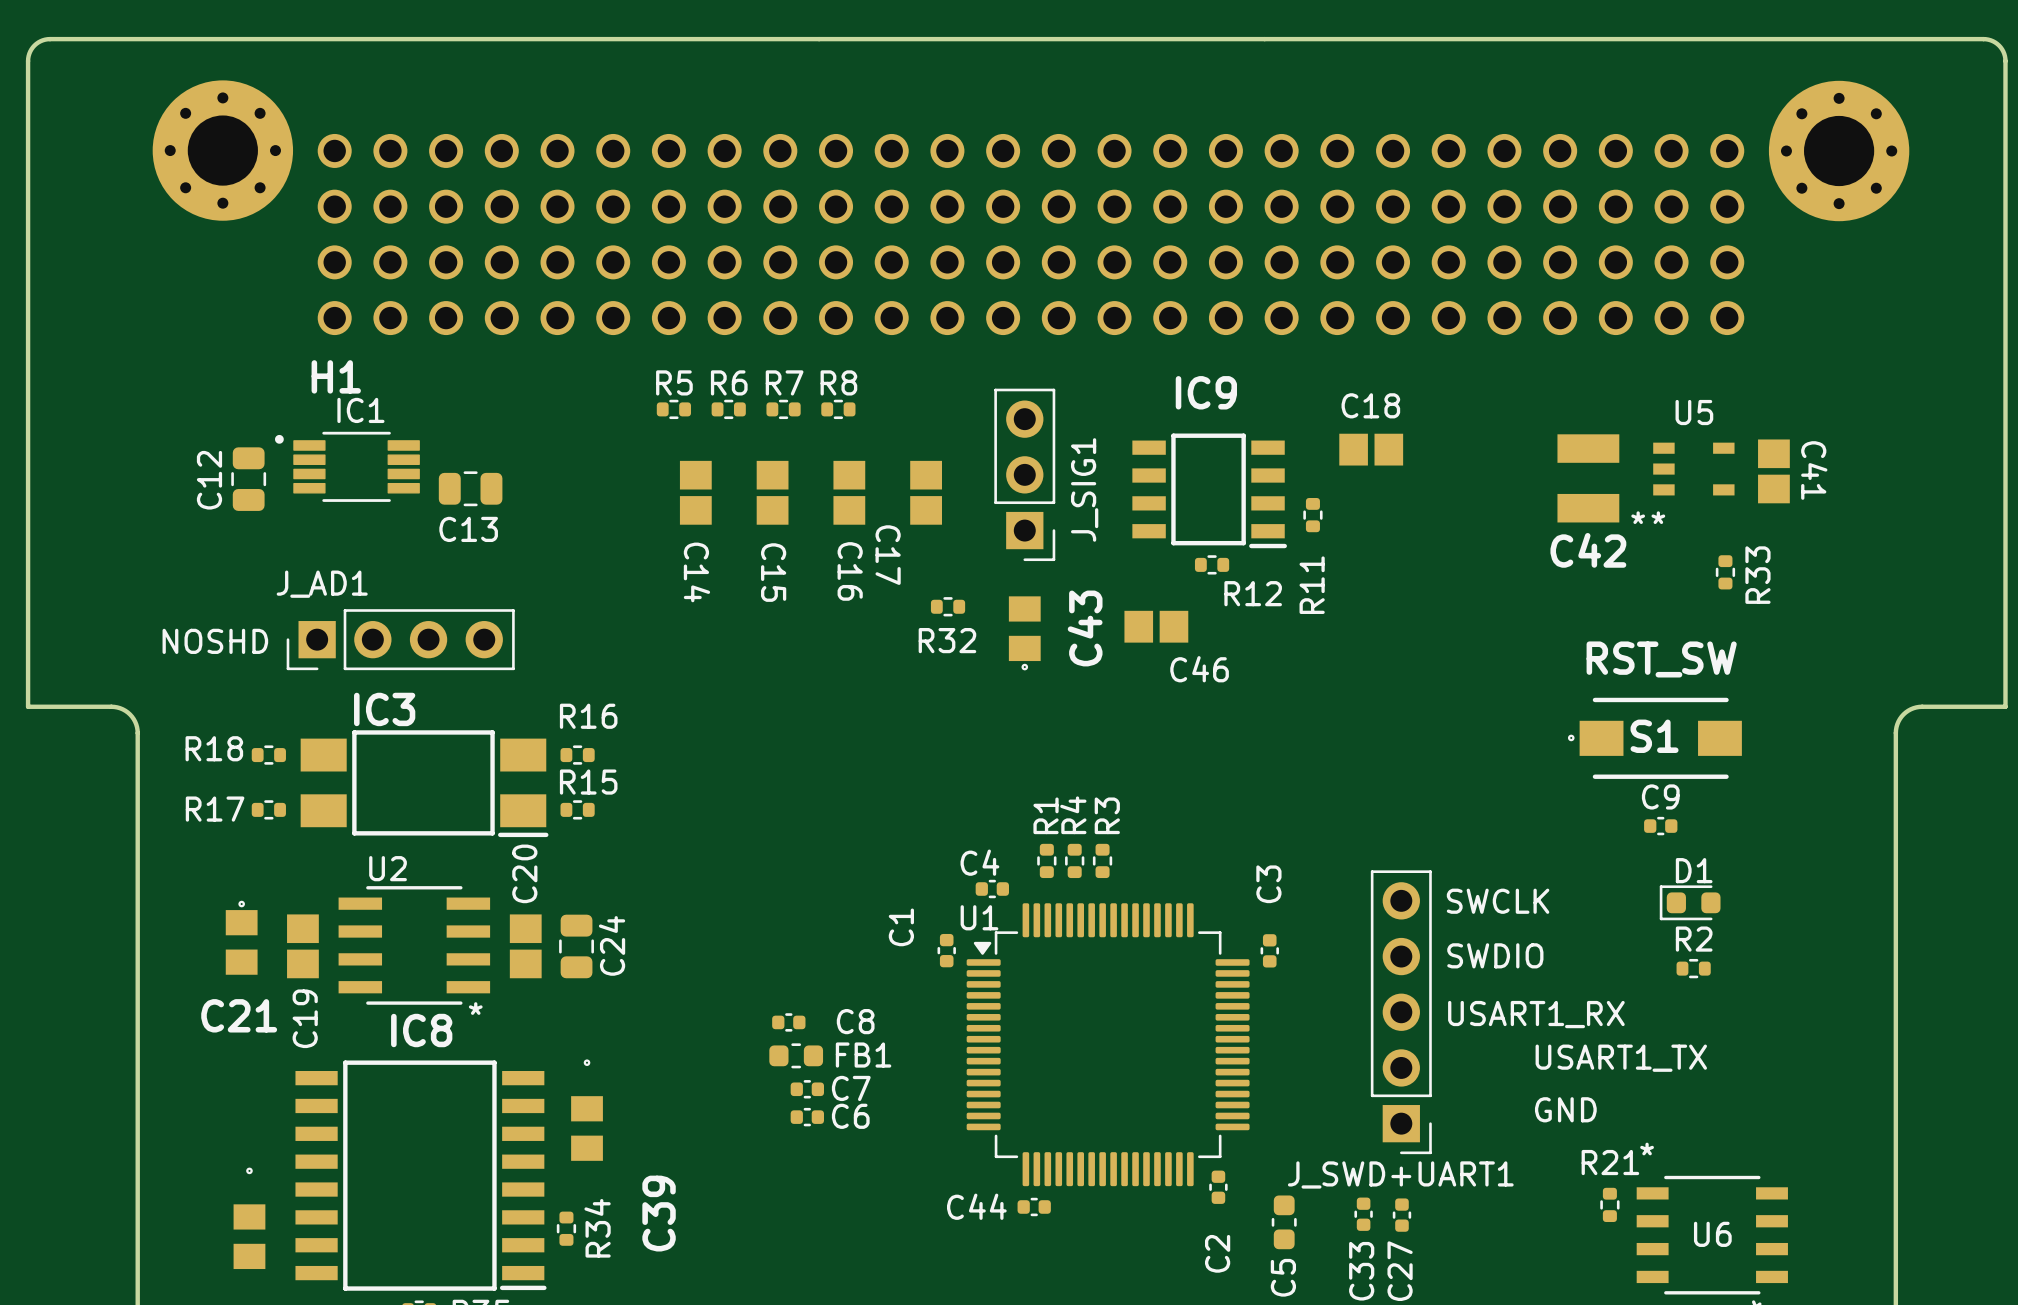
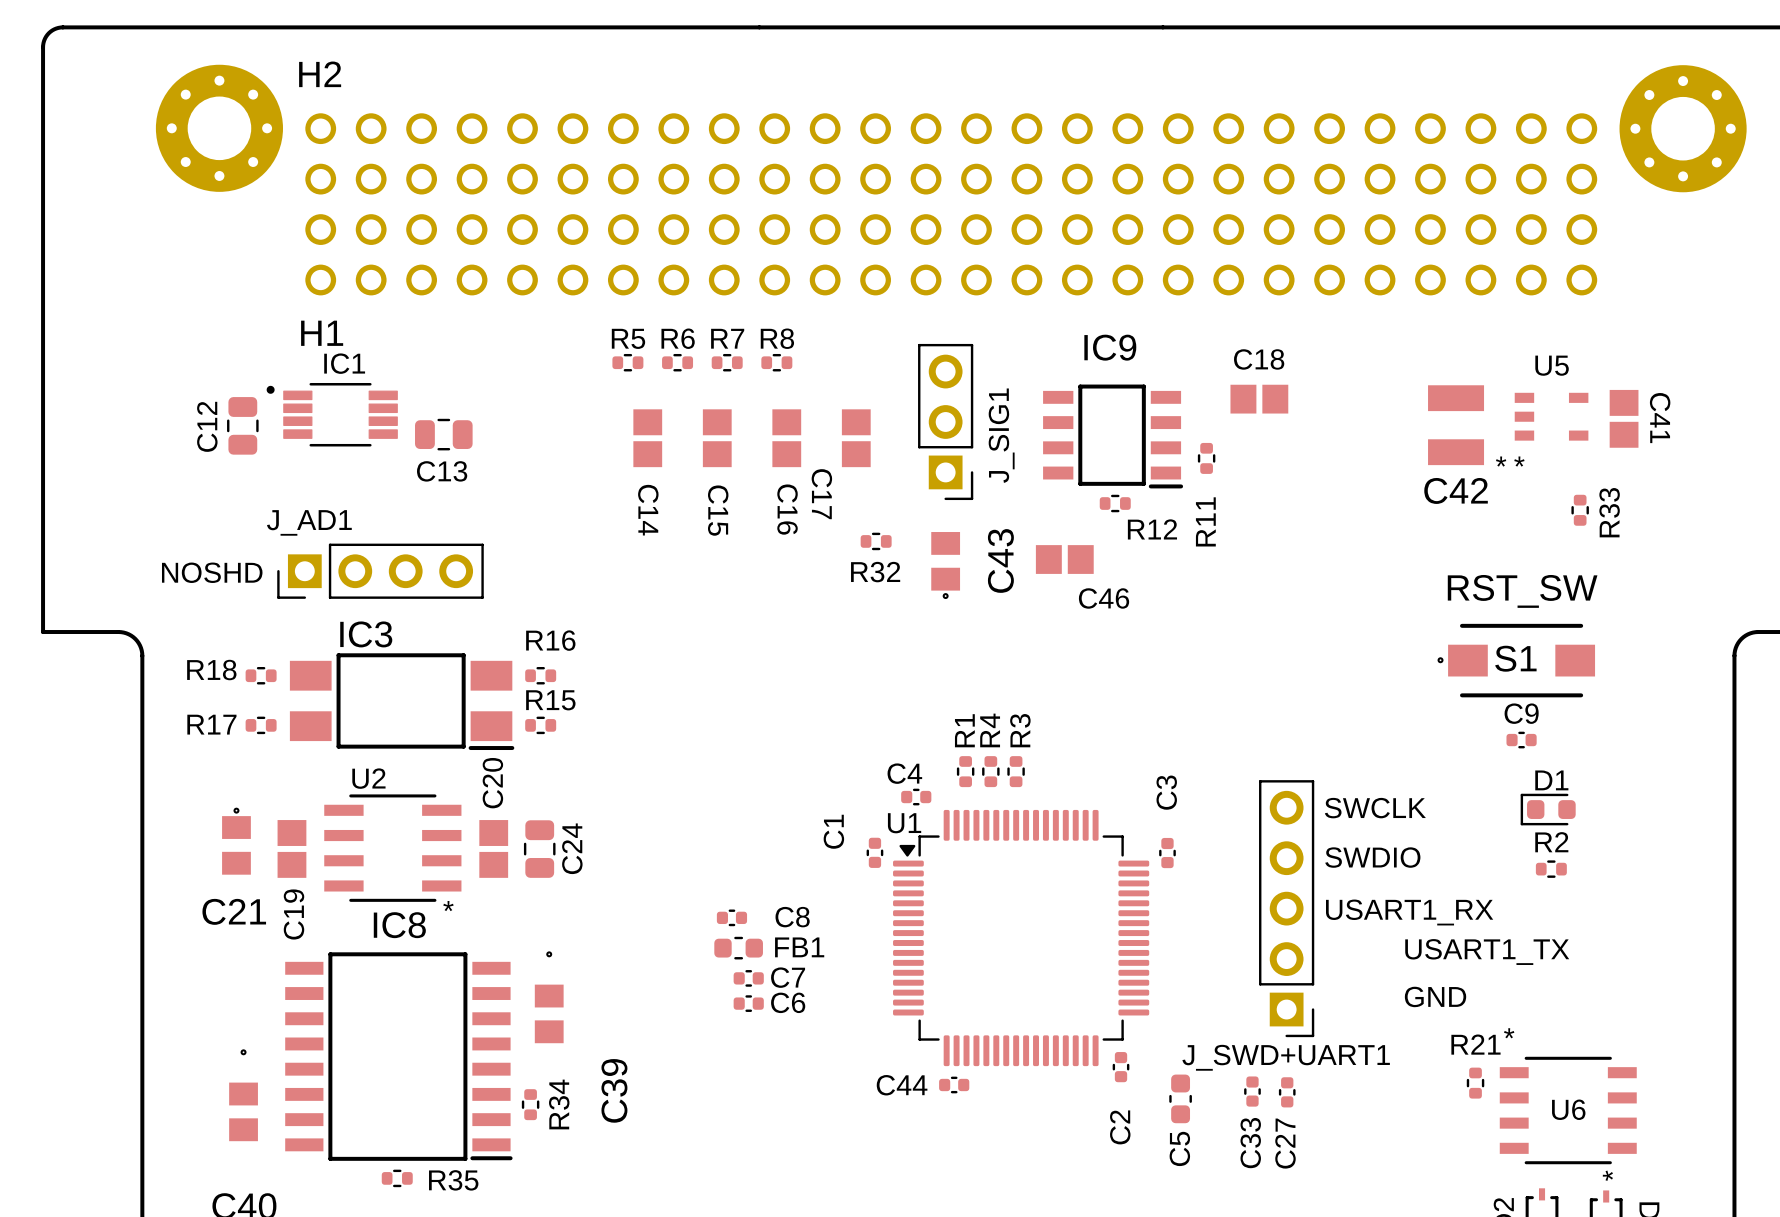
H2 name: none -> H2 (320, 74)

